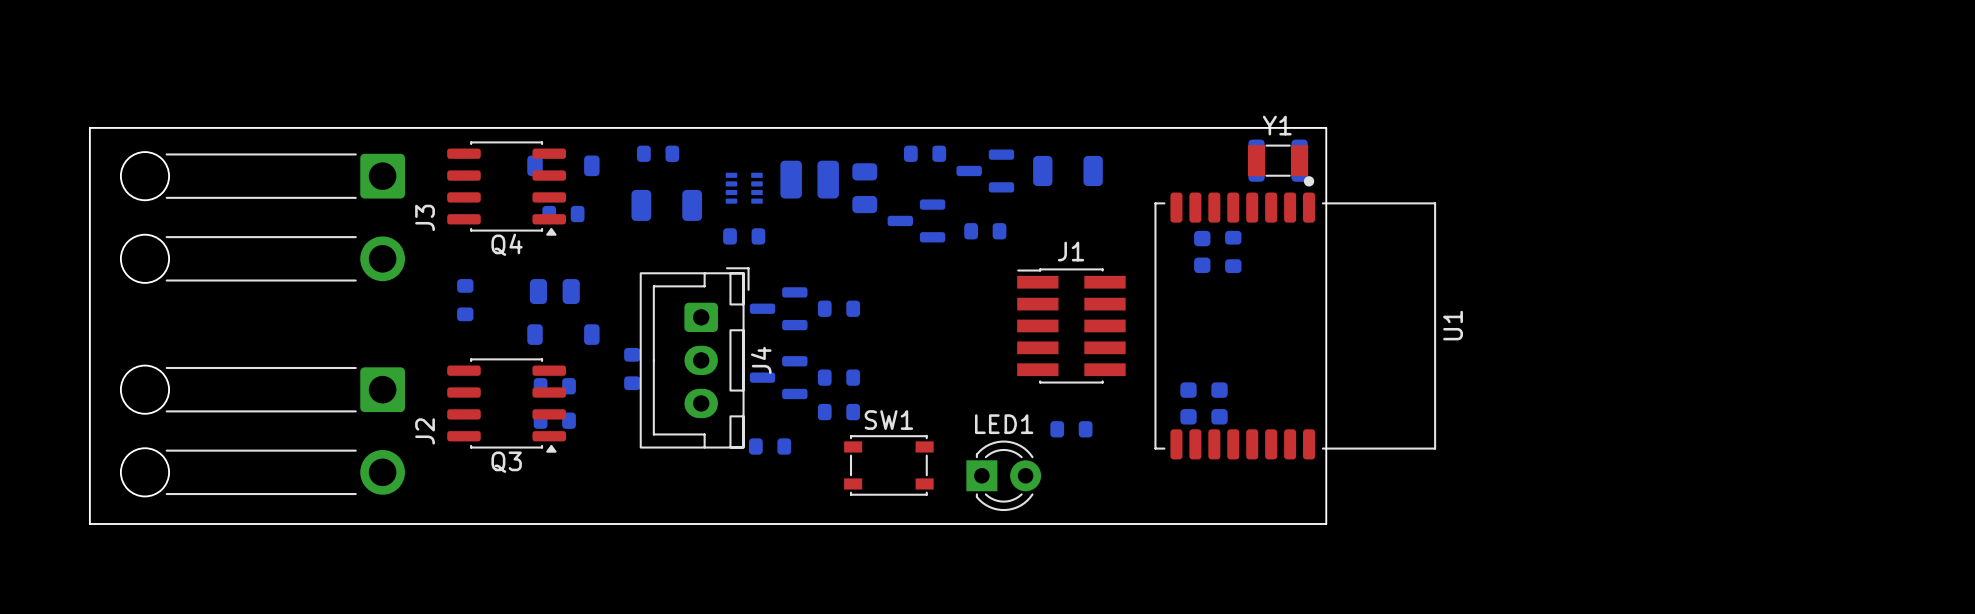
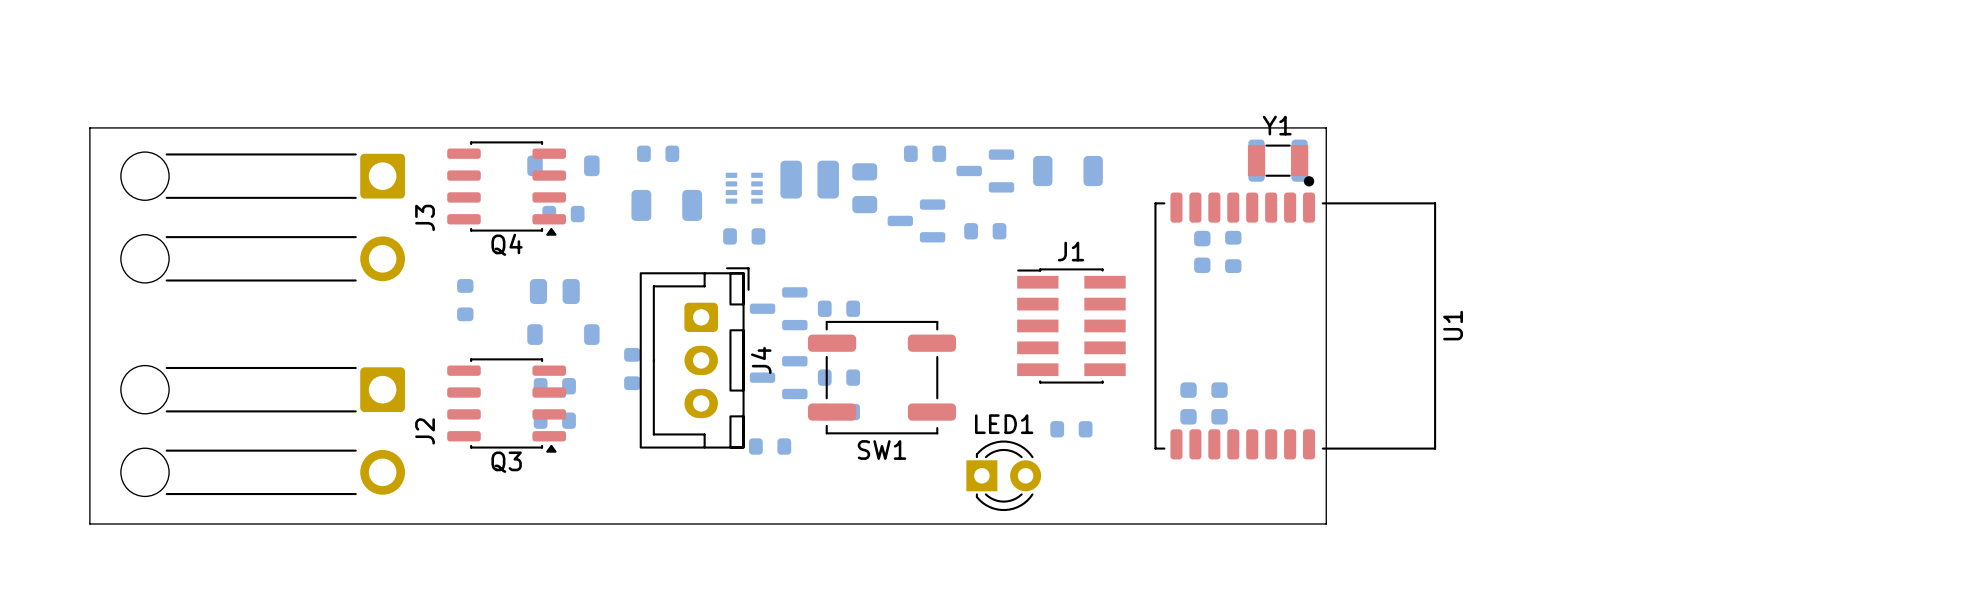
SW1 name position: SW1 (888, 420) -> SW1 (882, 450)
SW1 footprint: [844, 435, 934, 496] -> [807, 320, 957, 435]

